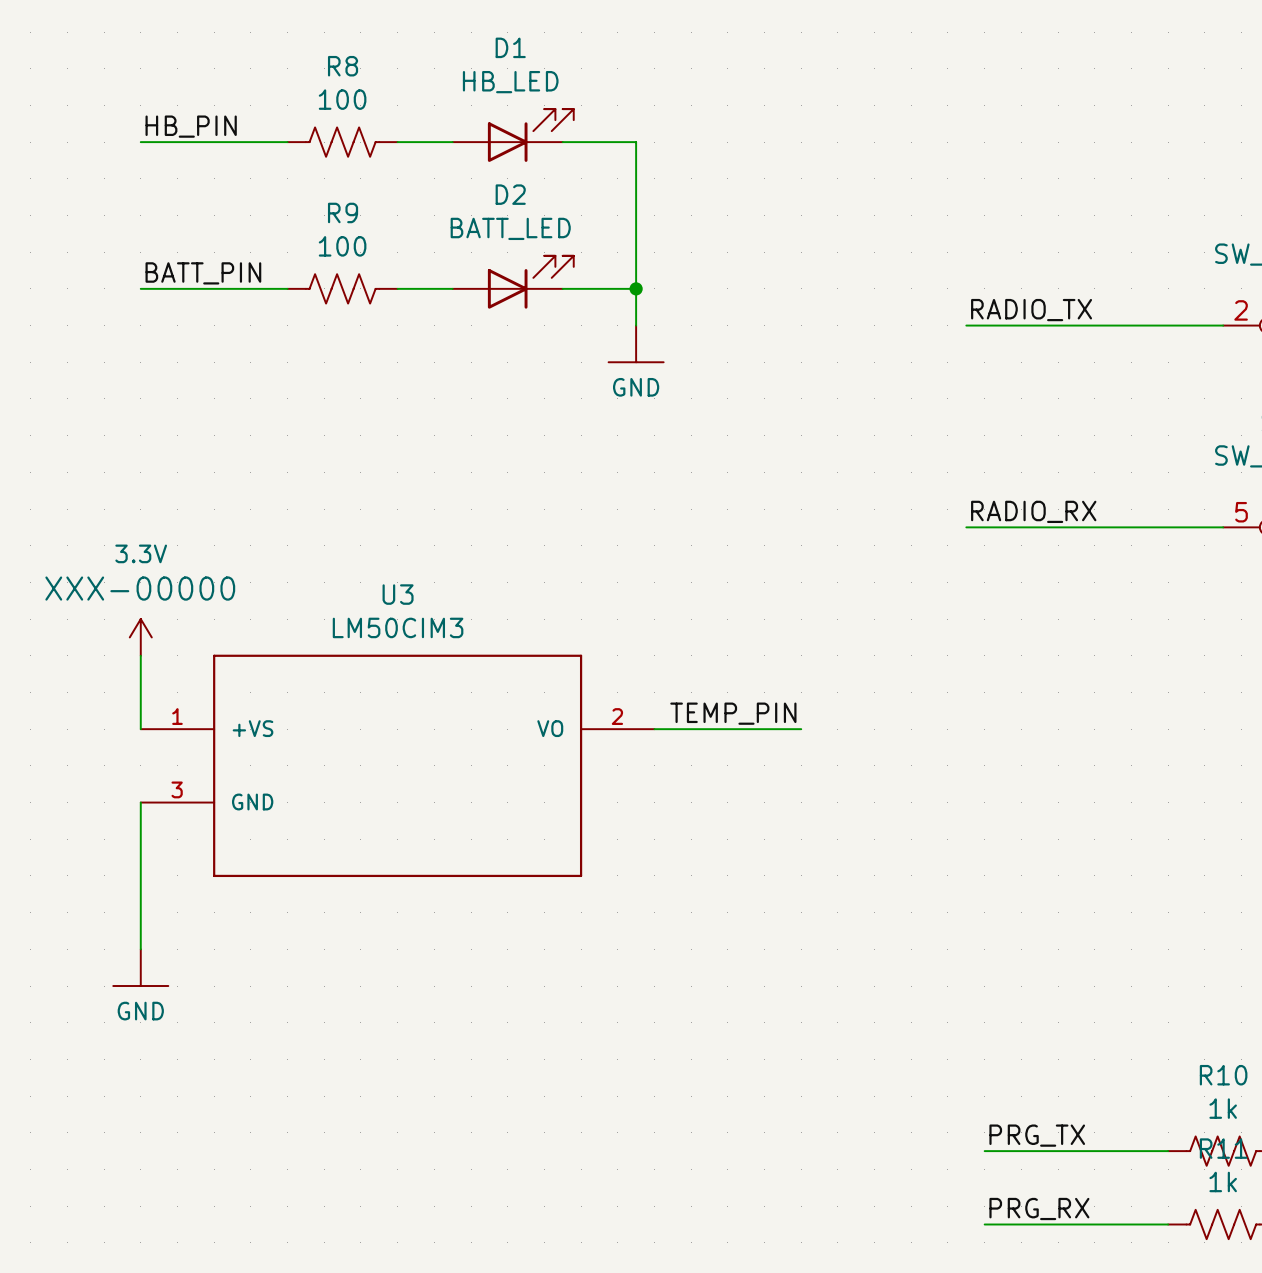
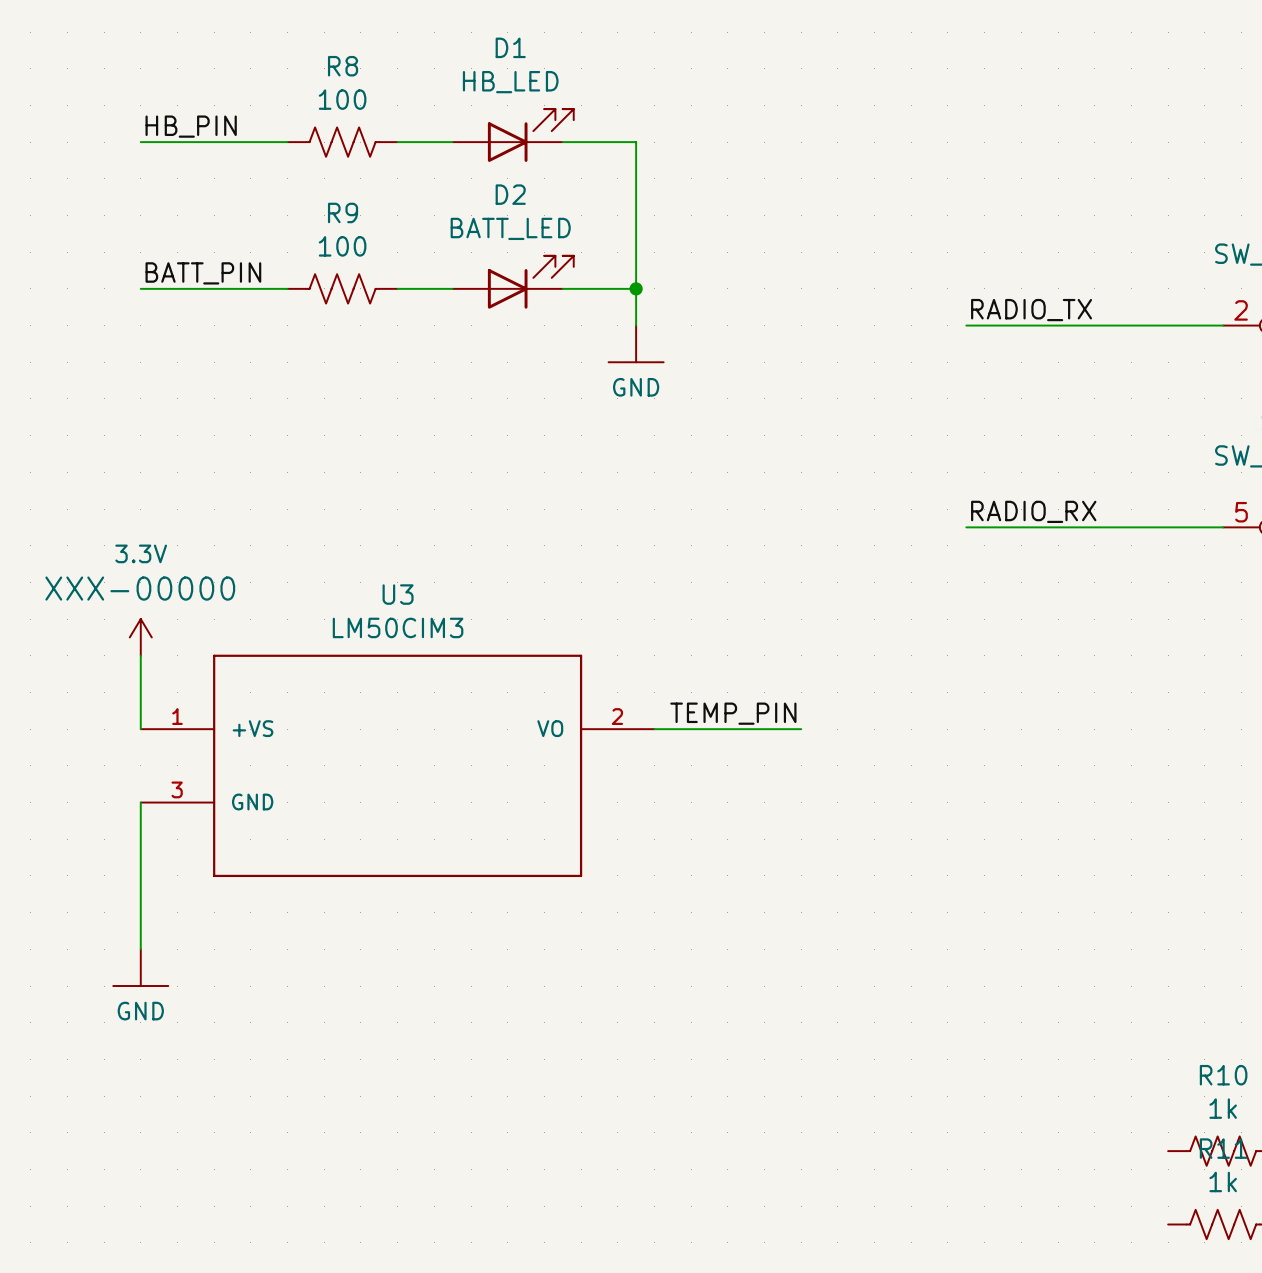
label: PRG_TX (1037, 1135) -> none
wire: (984, 1151) (1168, 1151) -> none
label: PRG_RX (1039, 1208) -> none
wire: (984, 1224) (1168, 1224) -> none

